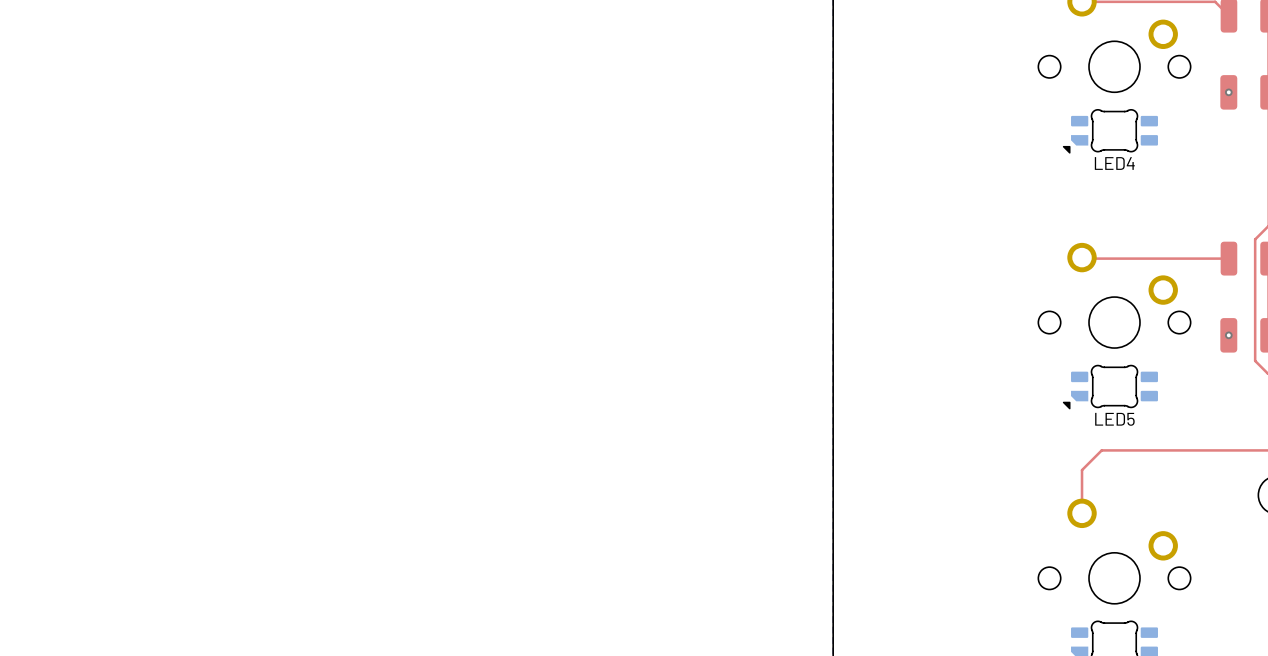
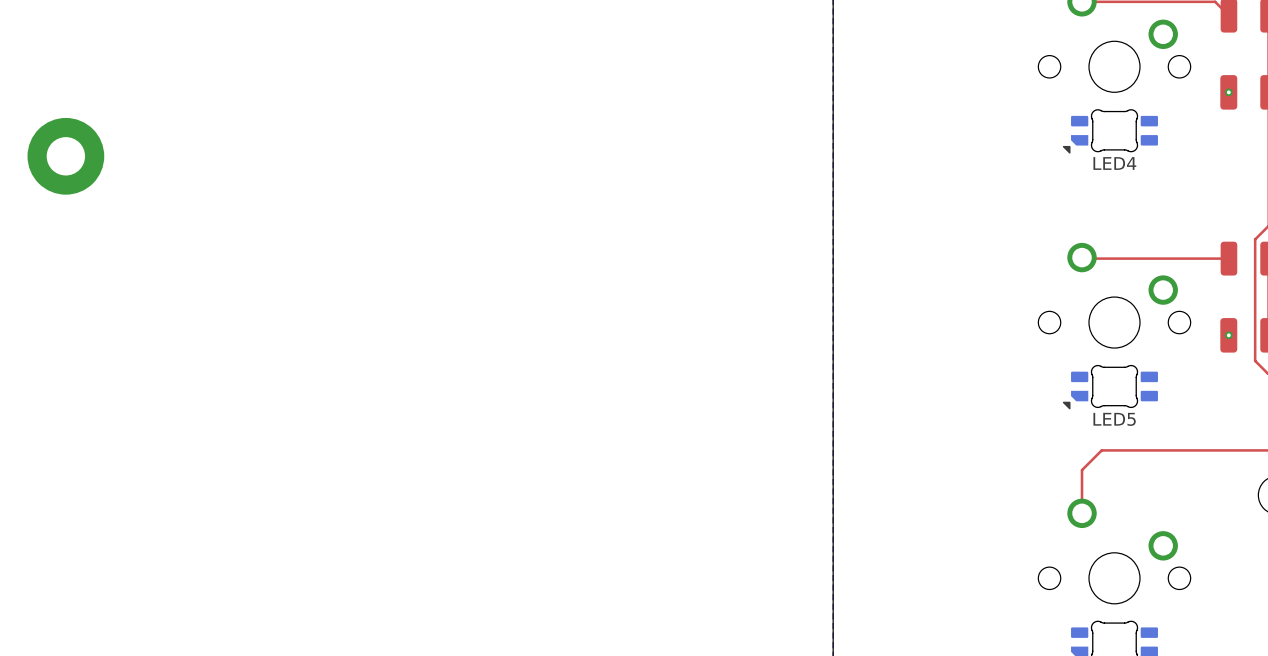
part: none -> (65, 156)

